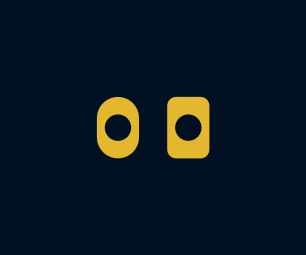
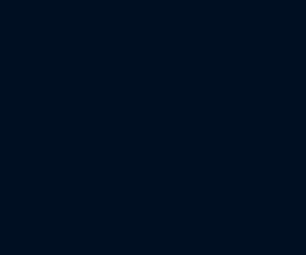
part: (153, 127) -> none

